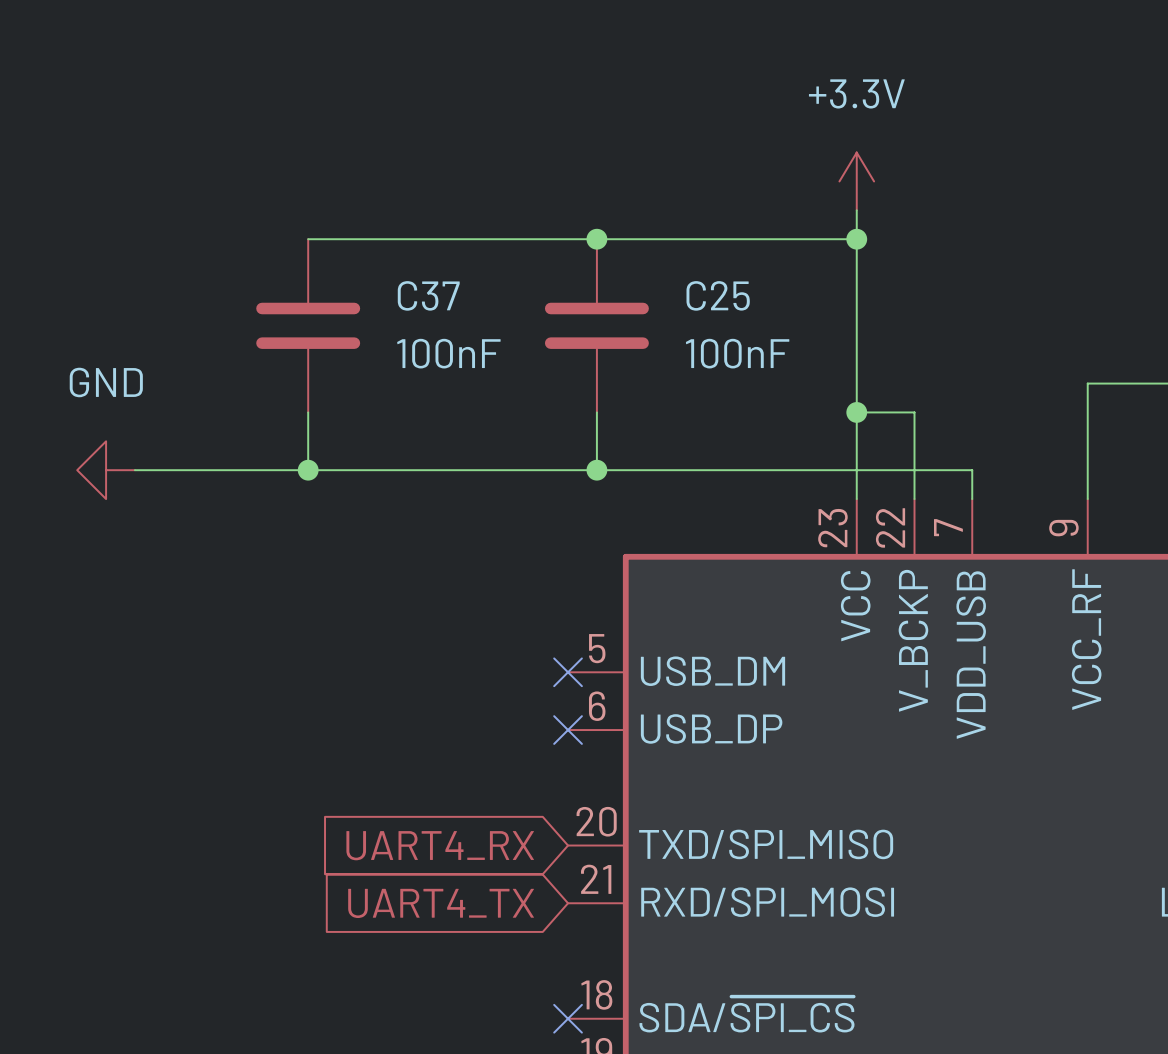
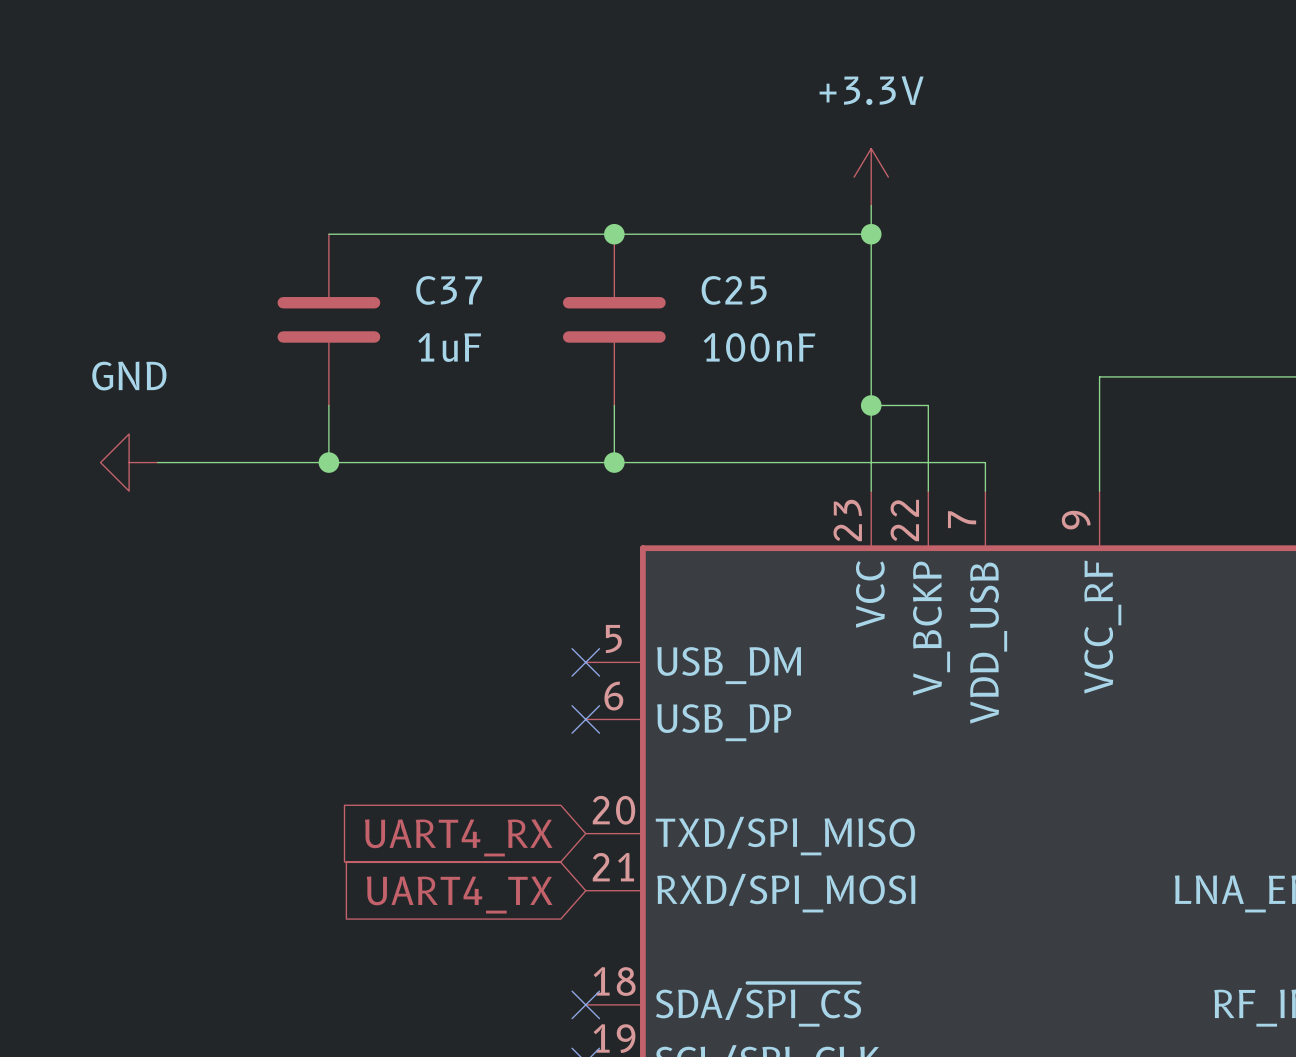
C37 value: 100nF (448, 353) -> 1uF (449, 347)

